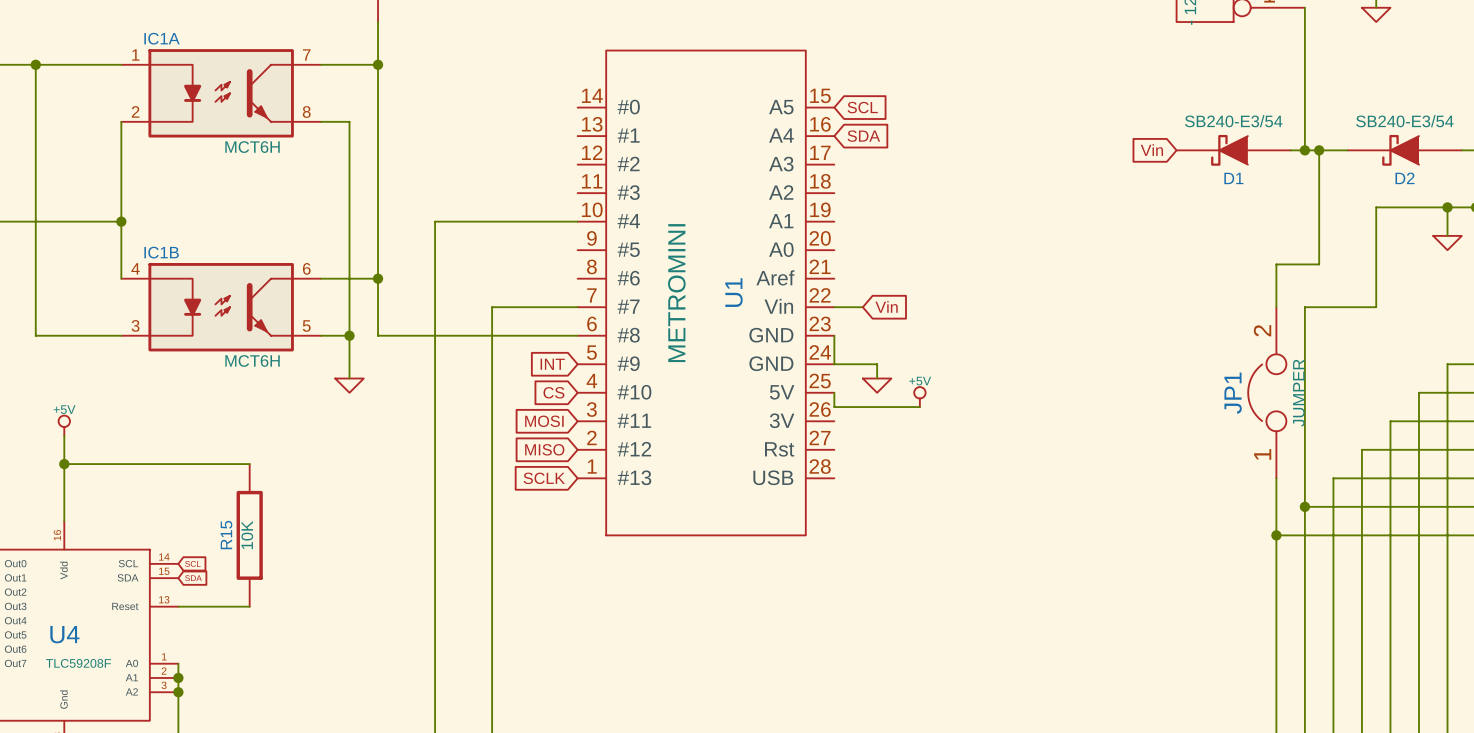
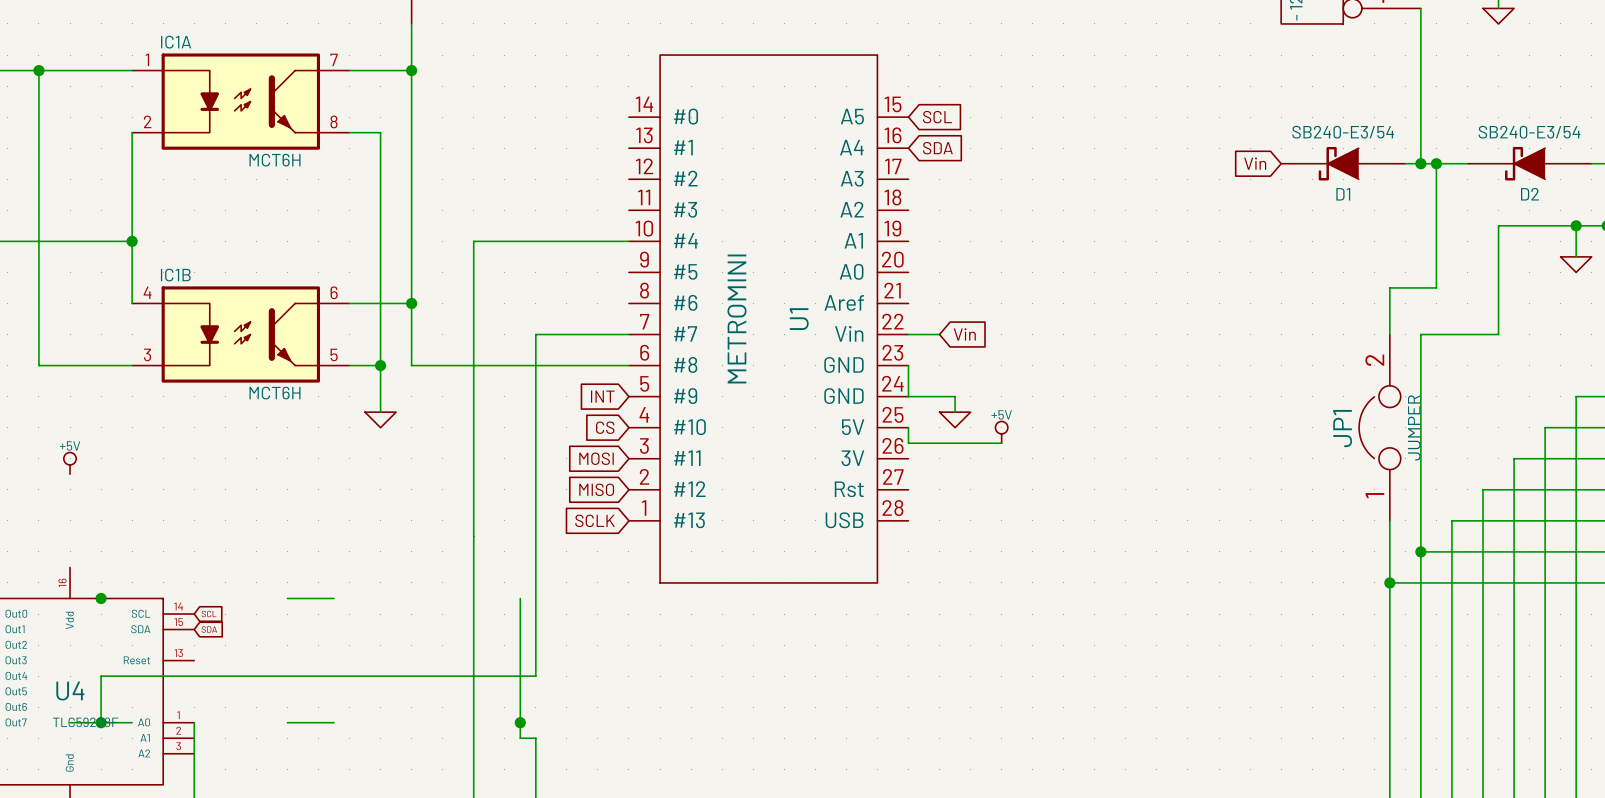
wire: (64, 435) (64, 521) -> none
wire: (64, 464) (249, 464) -> none
junction: (64, 464) -> none
R15: 10K (249, 535) -> none
junction: none -> (101, 598)
wire: none -> (287, 598) (333, 598)
wire: (178, 606) (249, 606) -> none
wire: (492, 620) (492, 677) -> (520, 598) (520, 738) (535, 738)
wire: none -> (535, 676) (101, 676) (101, 722)
wire: none -> (70, 722) (132, 722)
junction: none -> (101, 722)
wire: none -> (287, 722) (333, 722)
junction: none -> (520, 722)
junction: (178, 677) -> none
junction: (178, 692) -> none

